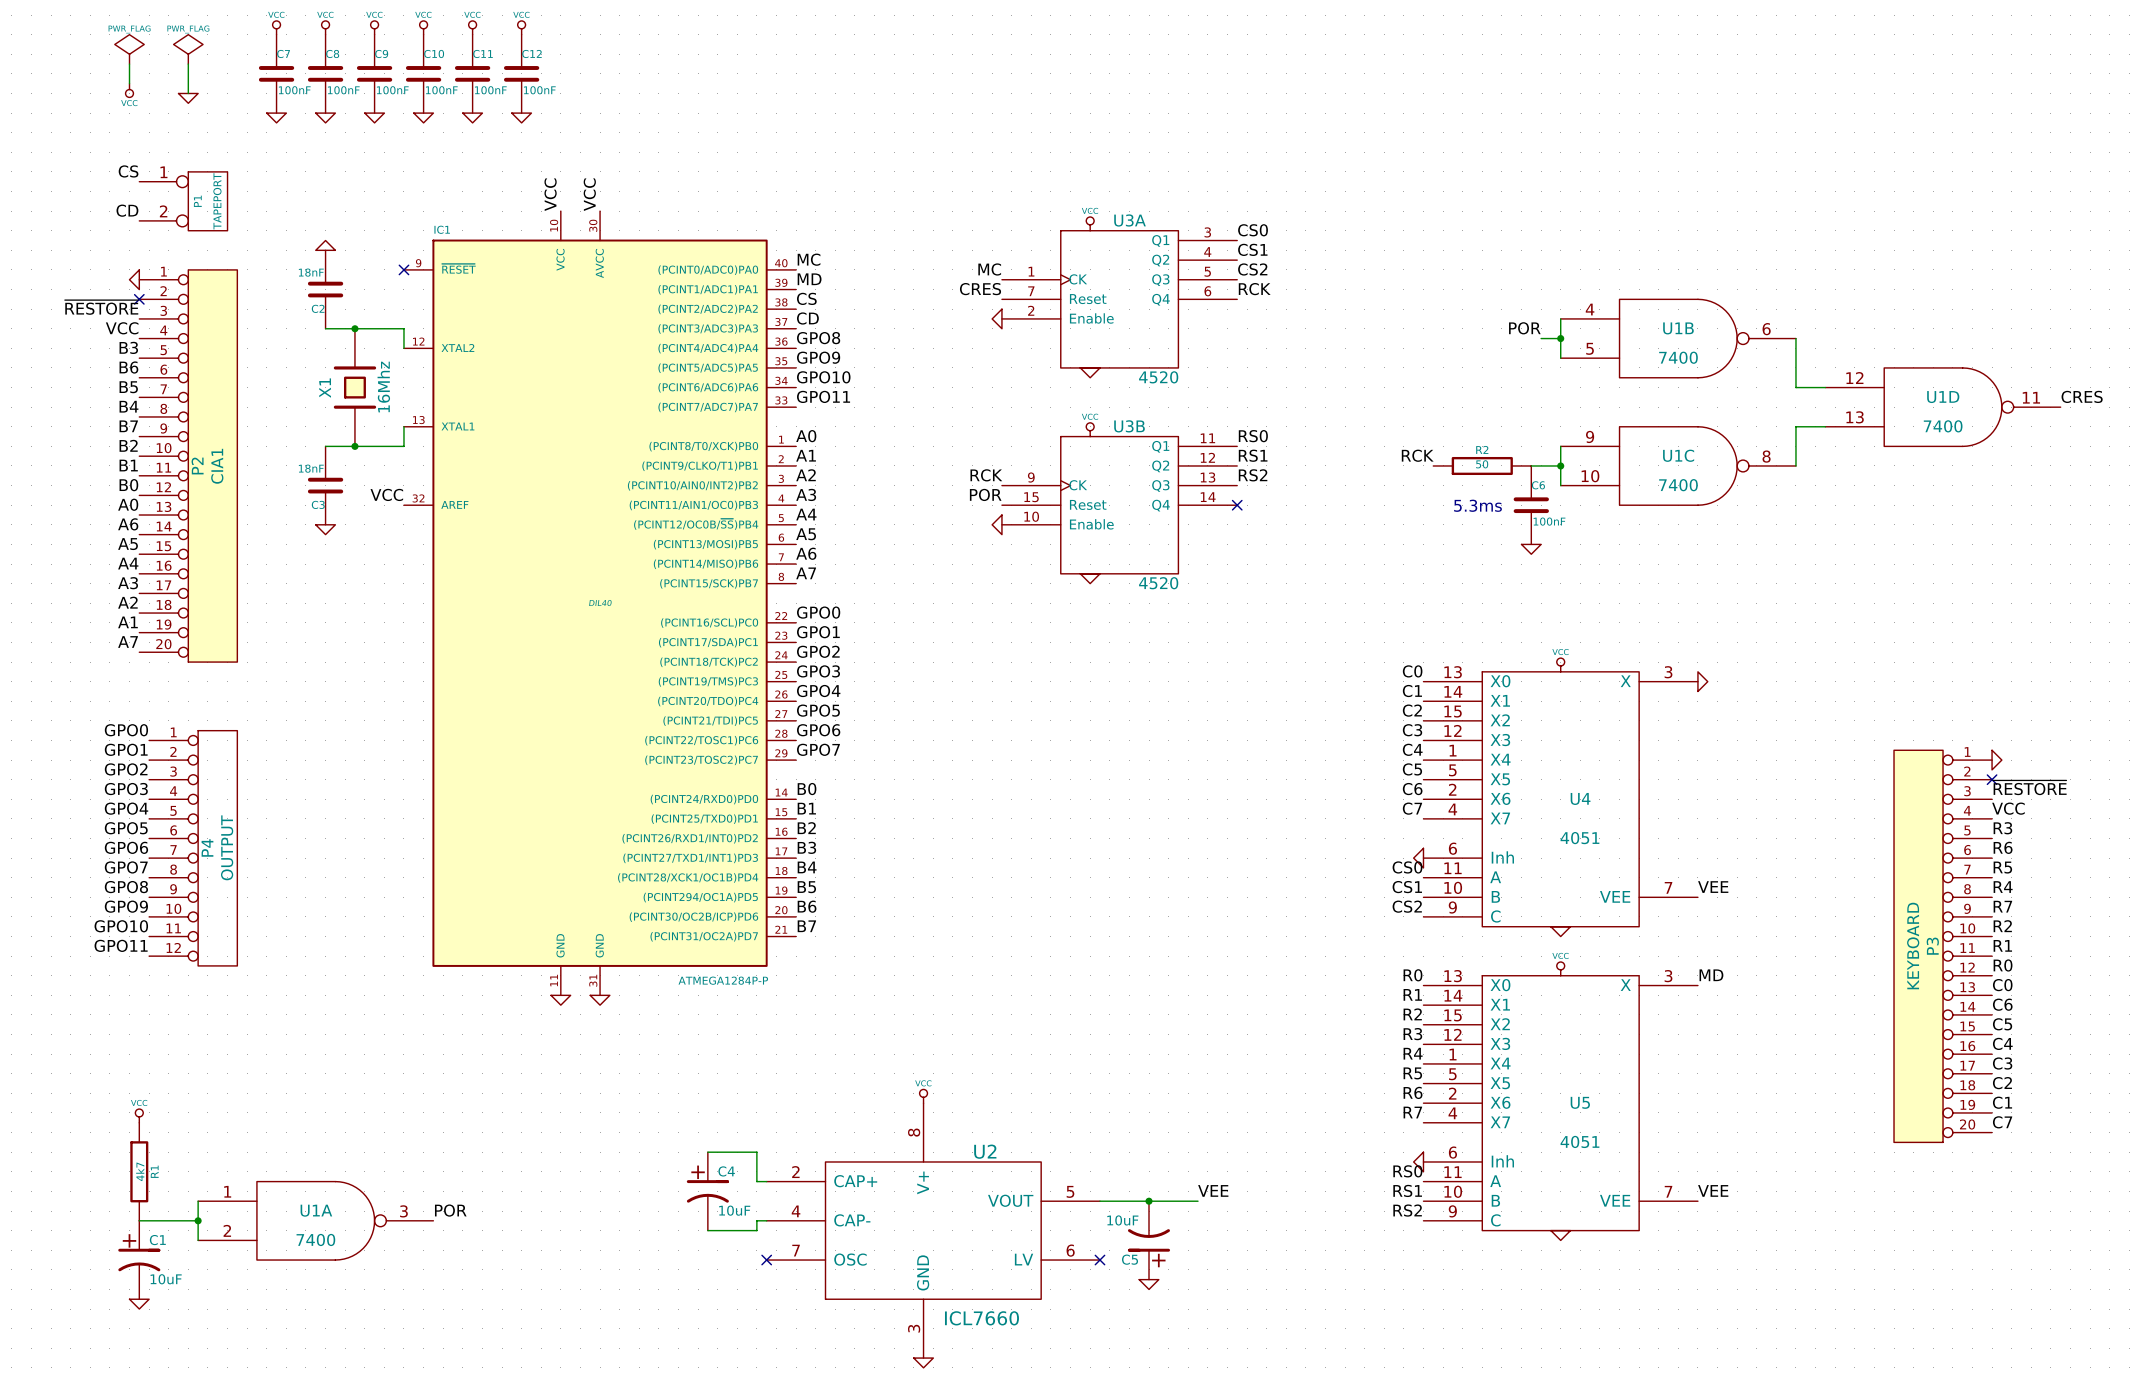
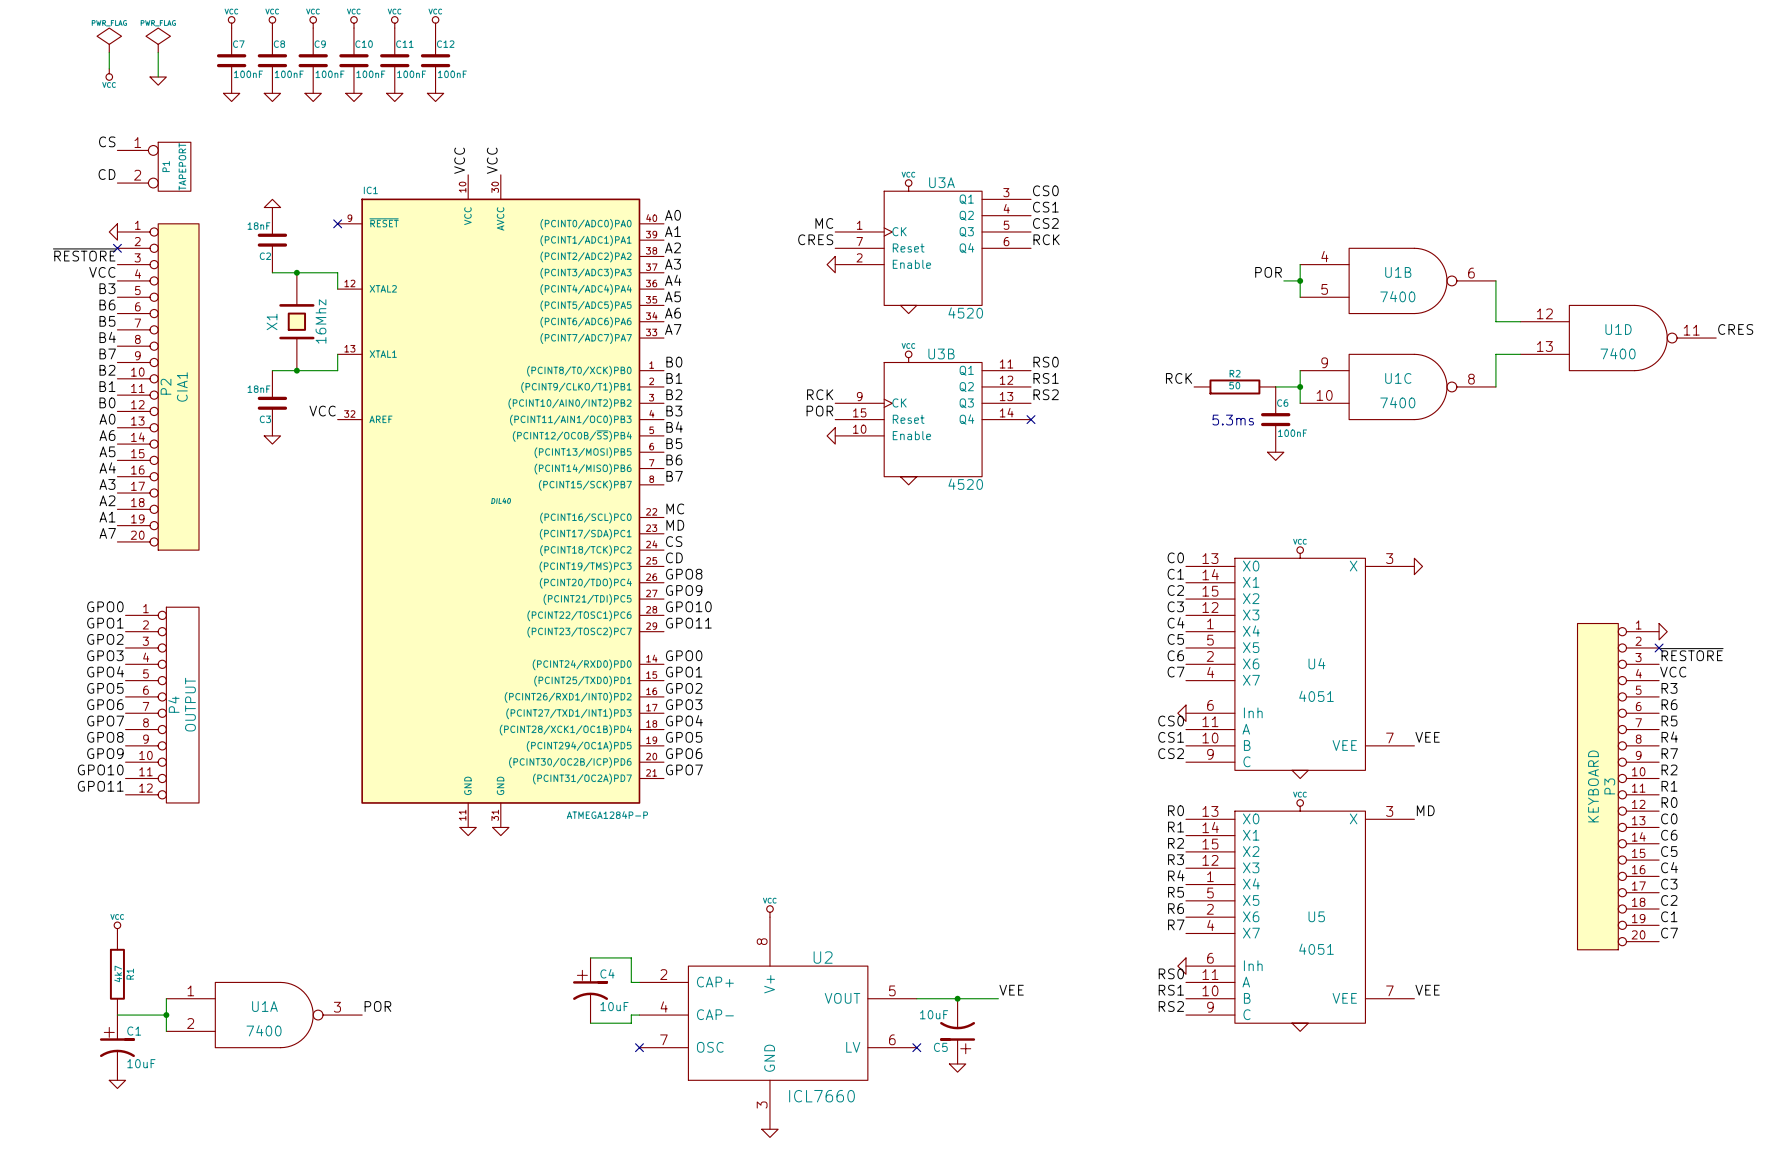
label: MC (809, 259) -> A0 (672, 215)
label: MD (809, 279) -> A1 (672, 231)
label: CS (806, 298) -> A2 (672, 247)
label: CD (807, 318) -> A3 (672, 264)
label: GPO8 (818, 338) -> A4 (673, 280)
label: GPO9 (818, 357) -> A5 (672, 296)
label: GPO10 (823, 377) -> A6 (672, 313)
label: GPO11 (823, 396) -> A7 (673, 329)
label: A0 (806, 436) -> B0 (674, 362)
label: A1 (806, 455) -> B1 (674, 378)
label: A2 (806, 475) -> B2 (674, 394)
label: A3 (806, 494) -> B3 (674, 411)
label: A4 (806, 514) -> B4 (674, 427)
label: A5 (806, 534) -> B5 (674, 443)
label: A6 (806, 553) -> B6 (674, 460)
label: A7 (806, 573) -> B7 (674, 476)
label: GPO0 (818, 612) -> MC (675, 508)
label: GPO1 (818, 632) -> MD (675, 525)
label: GPO2 (818, 651) -> CS (674, 541)
label: GPO3 (818, 671) -> CD (674, 557)
label: GPO4 (818, 691) -> GPO8 (684, 574)
label: GPO5 (818, 710) -> GPO9 (684, 590)
label: GPO6 (818, 730) -> GPO10 (688, 606)
label: GPO7 (818, 749) -> GPO11 (688, 623)
label: B0 (807, 789) -> GPO0 (684, 655)
label: B1 (806, 808) -> GPO1 (684, 672)
label: B2 (806, 828) -> GPO2 (684, 688)
label: B3 (806, 847) -> GPO3 (684, 704)
label: B4 (807, 867) -> GPO4 (684, 720)
label: B5 (806, 887) -> GPO5 (684, 737)
label: B6 (807, 906) -> GPO6 (684, 753)
label: B7 (806, 926) -> GPO7 (684, 769)

